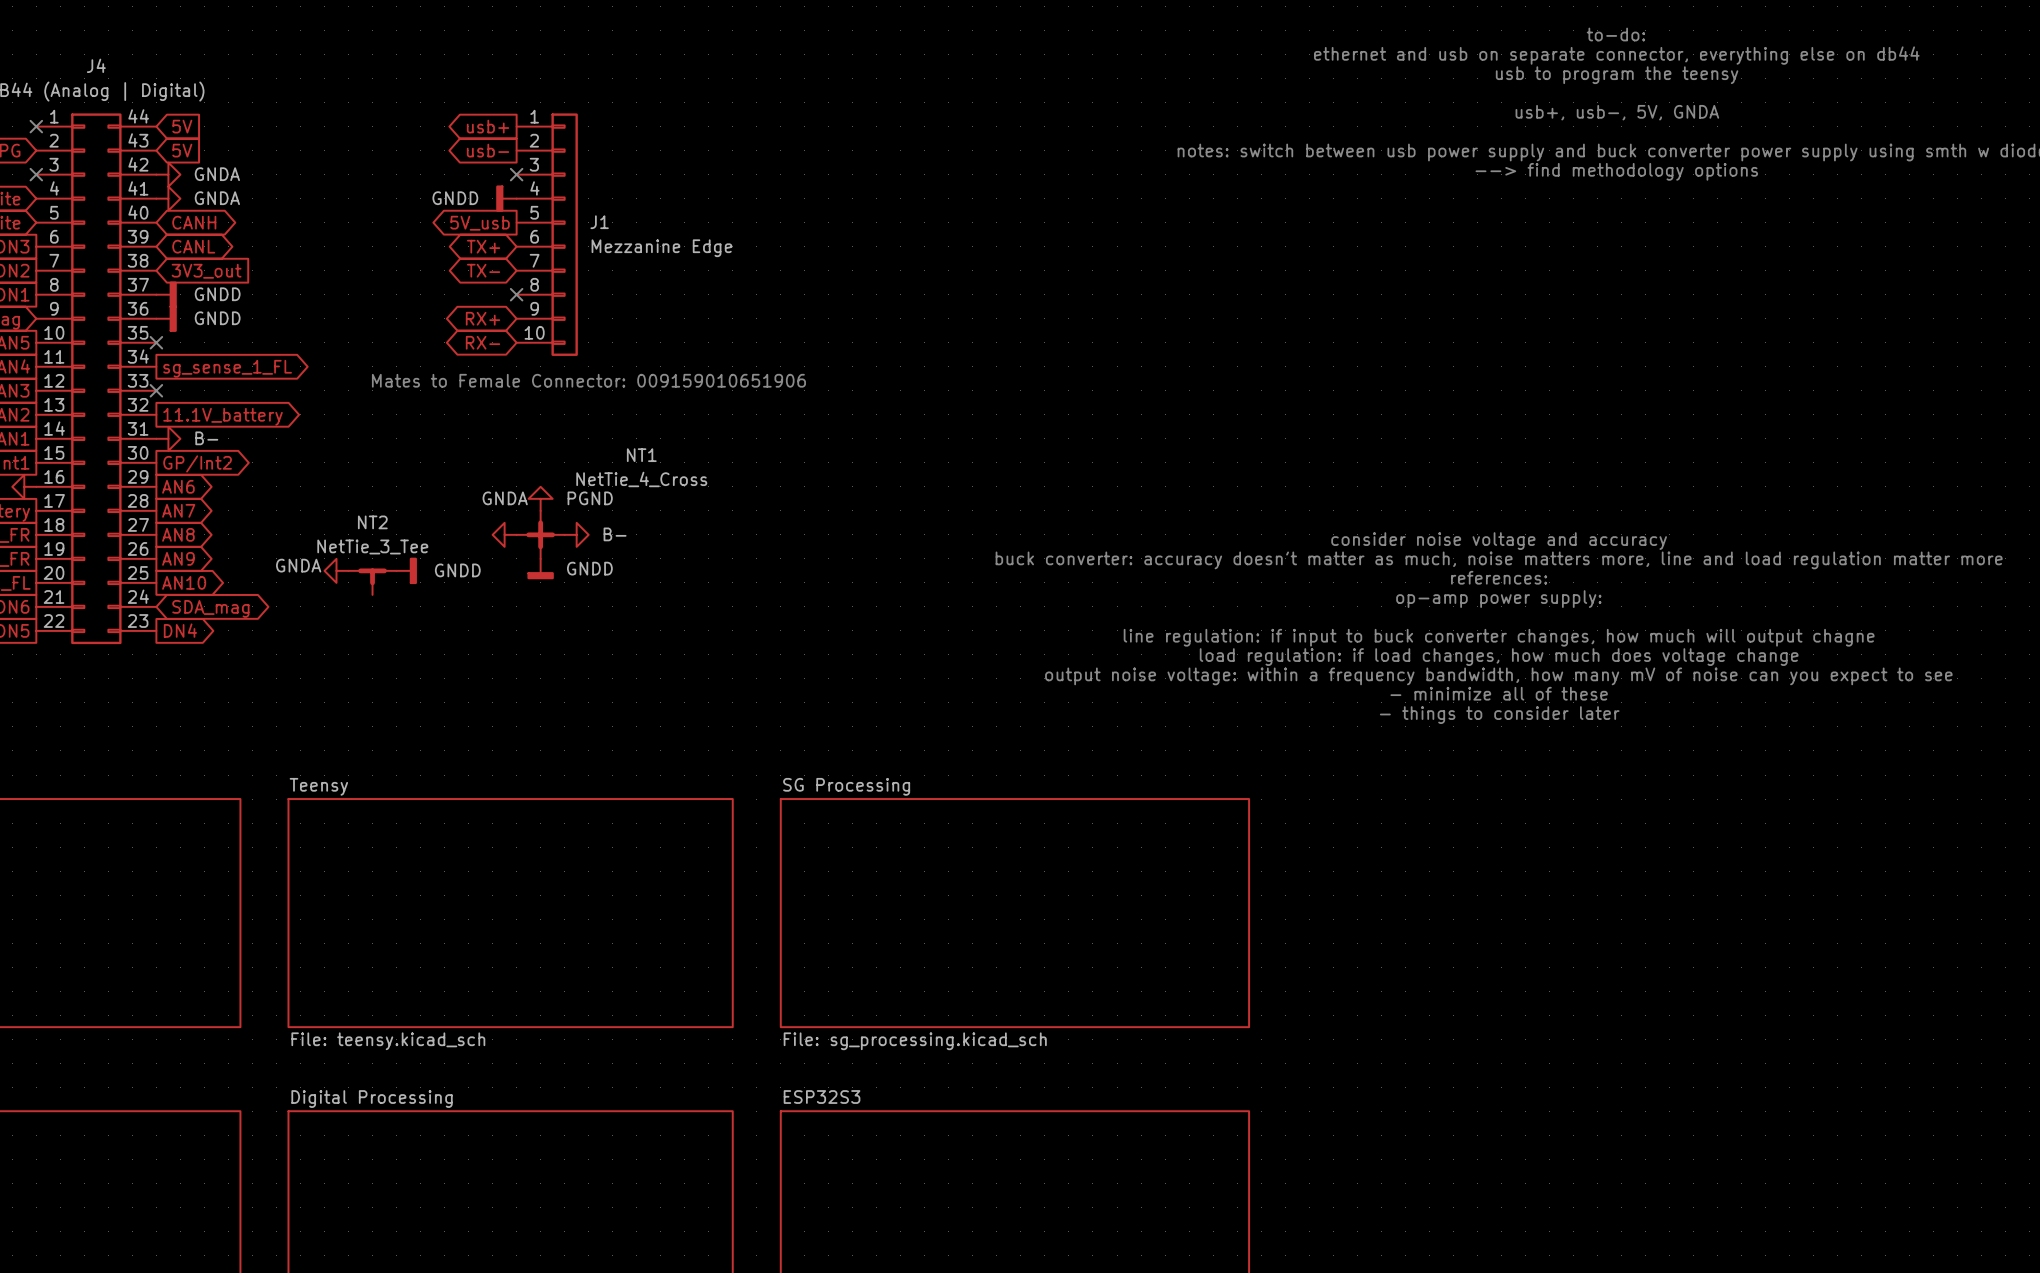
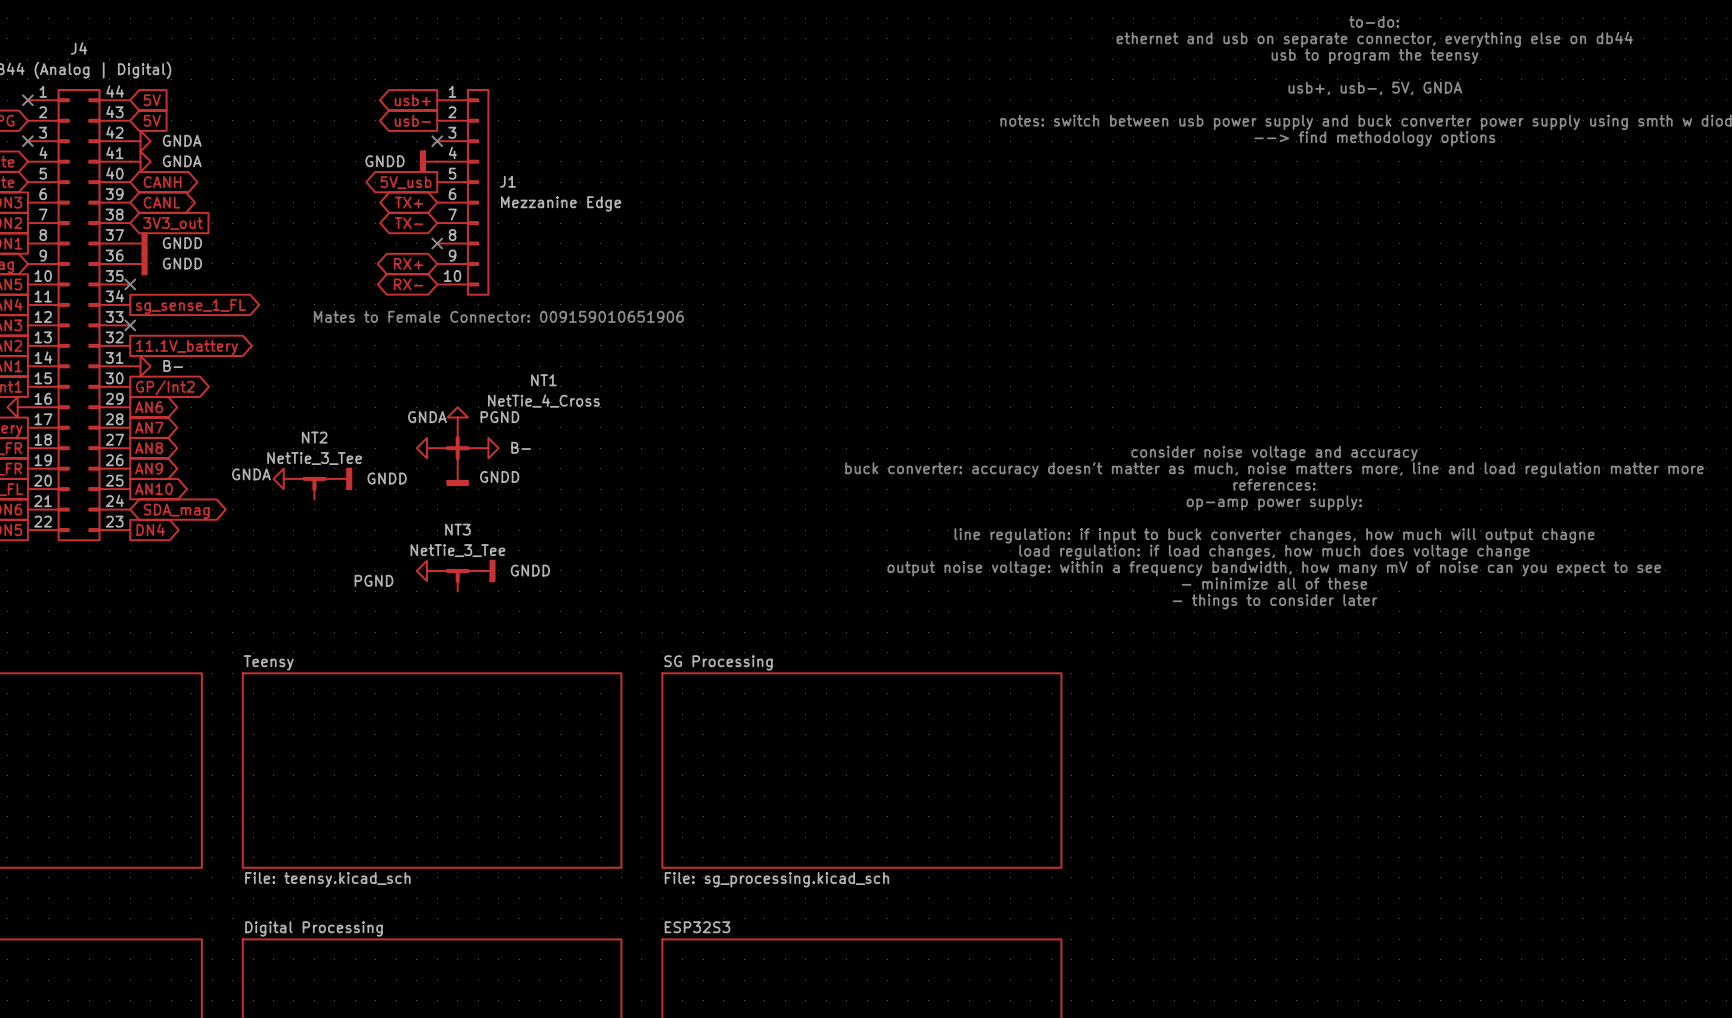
power symbol: none -> PGND (426, 570)
power symbol: none -> GNDD (486, 570)
NT3: none -> NetTie_3_Tee (457, 580)

